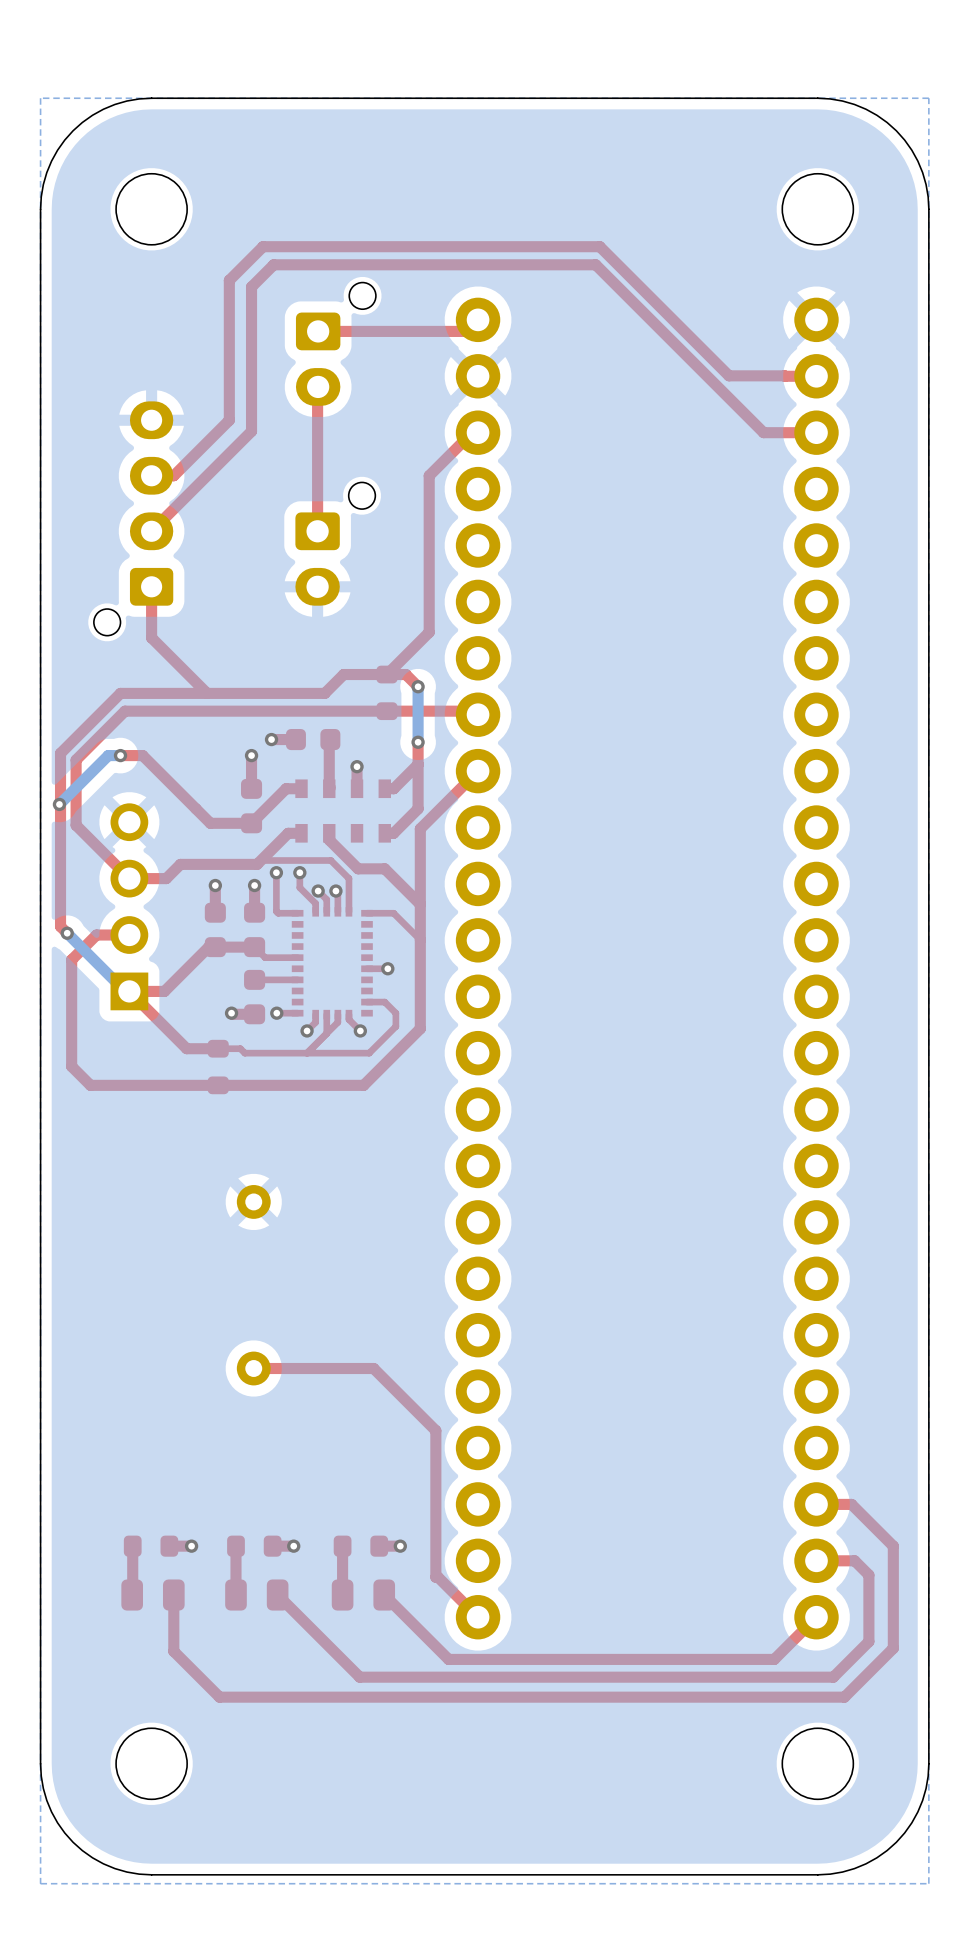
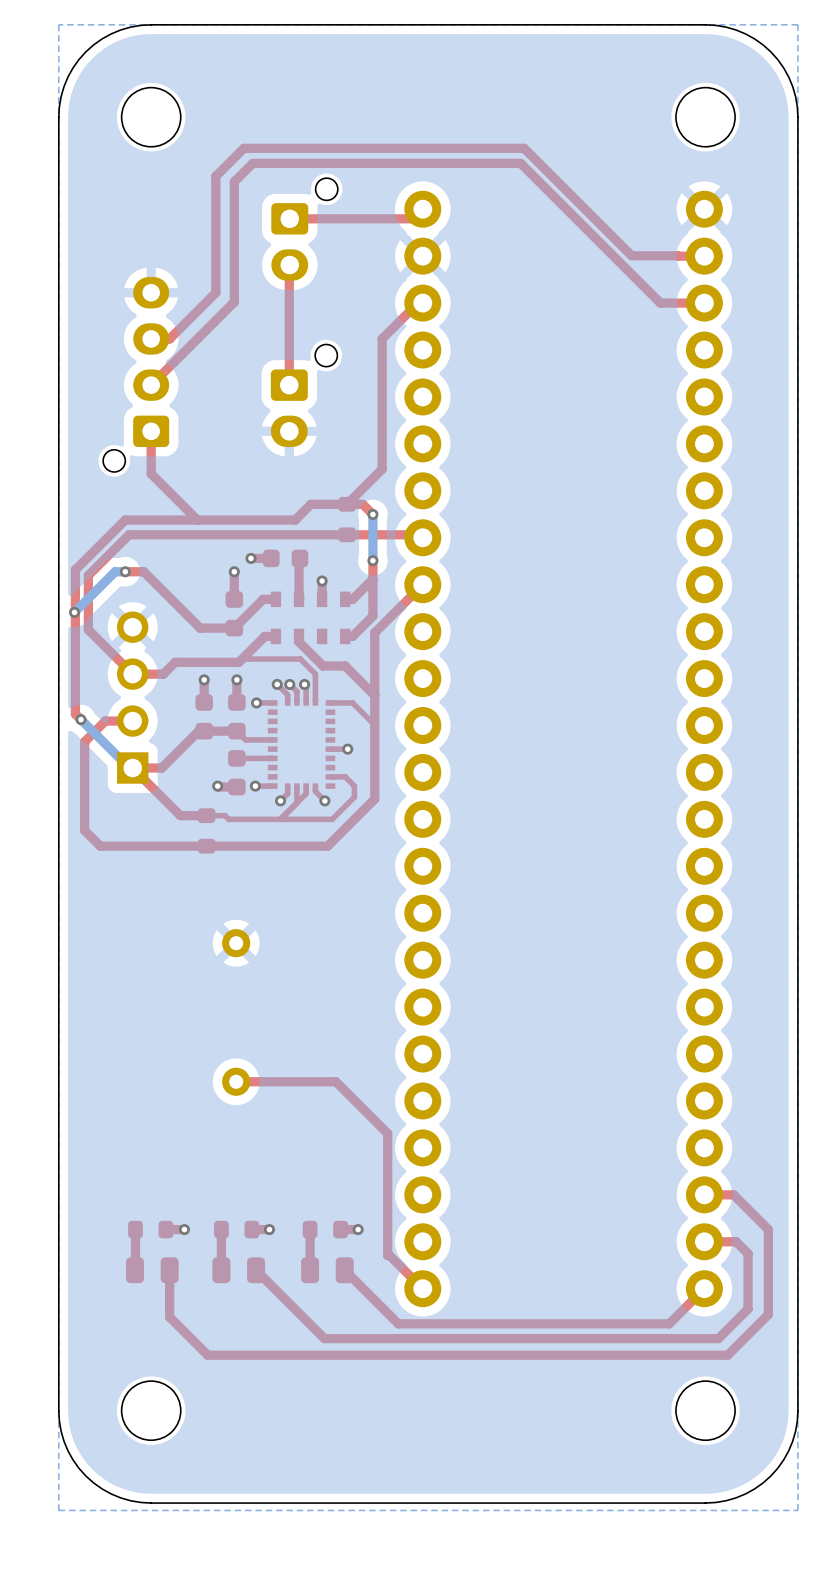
top track: (276, 872) (276, 911) (278, 913) -> none
via: (276, 872) -> none
top track: (299, 872) (299, 887) (303, 890) -> none
via: (299, 872) -> none
via: none -> (277, 684)
via: none -> (256, 702)

